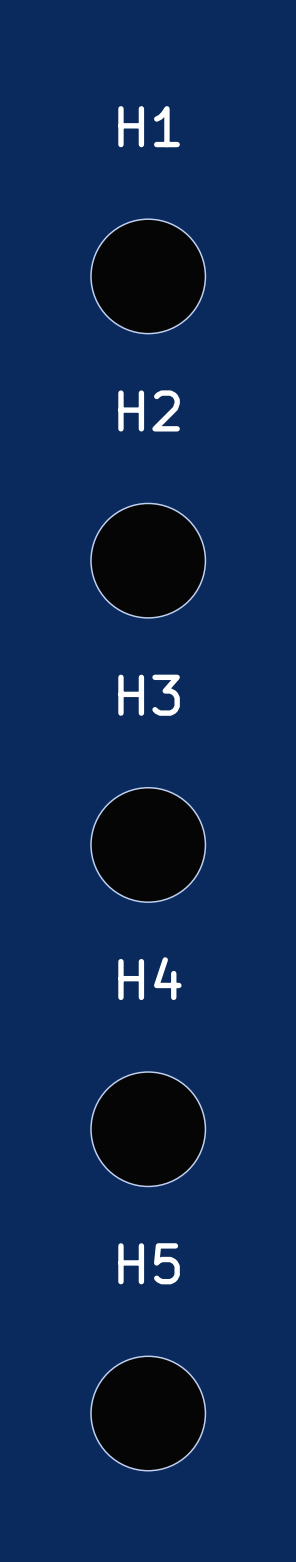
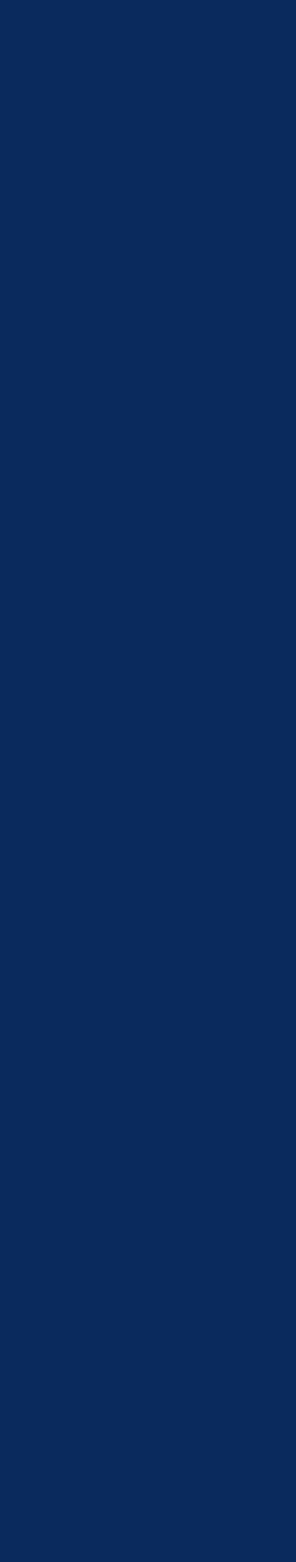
H1: (148, 276) -> none
H2: (148, 560) -> none
H3: (148, 844) -> none
H4: (148, 1129) -> none
H5: (148, 1413) -> none

